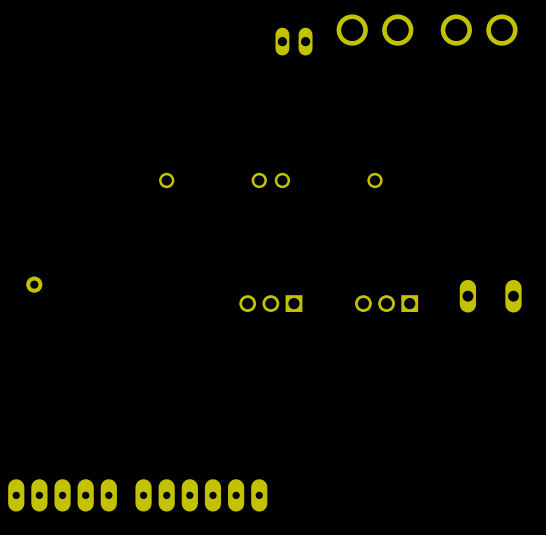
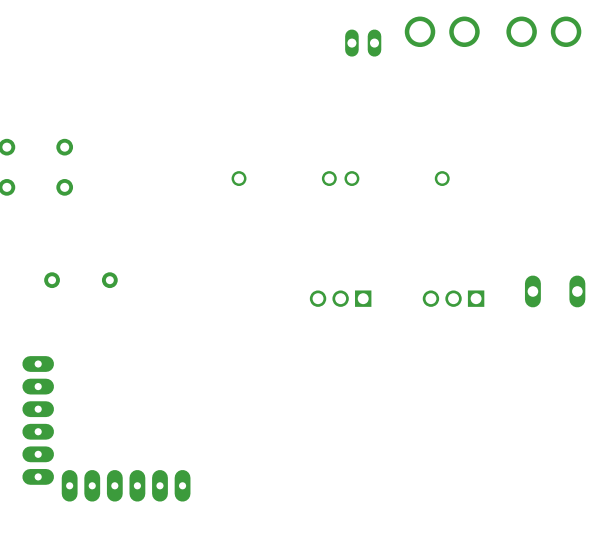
part: (201, 495) -> none

